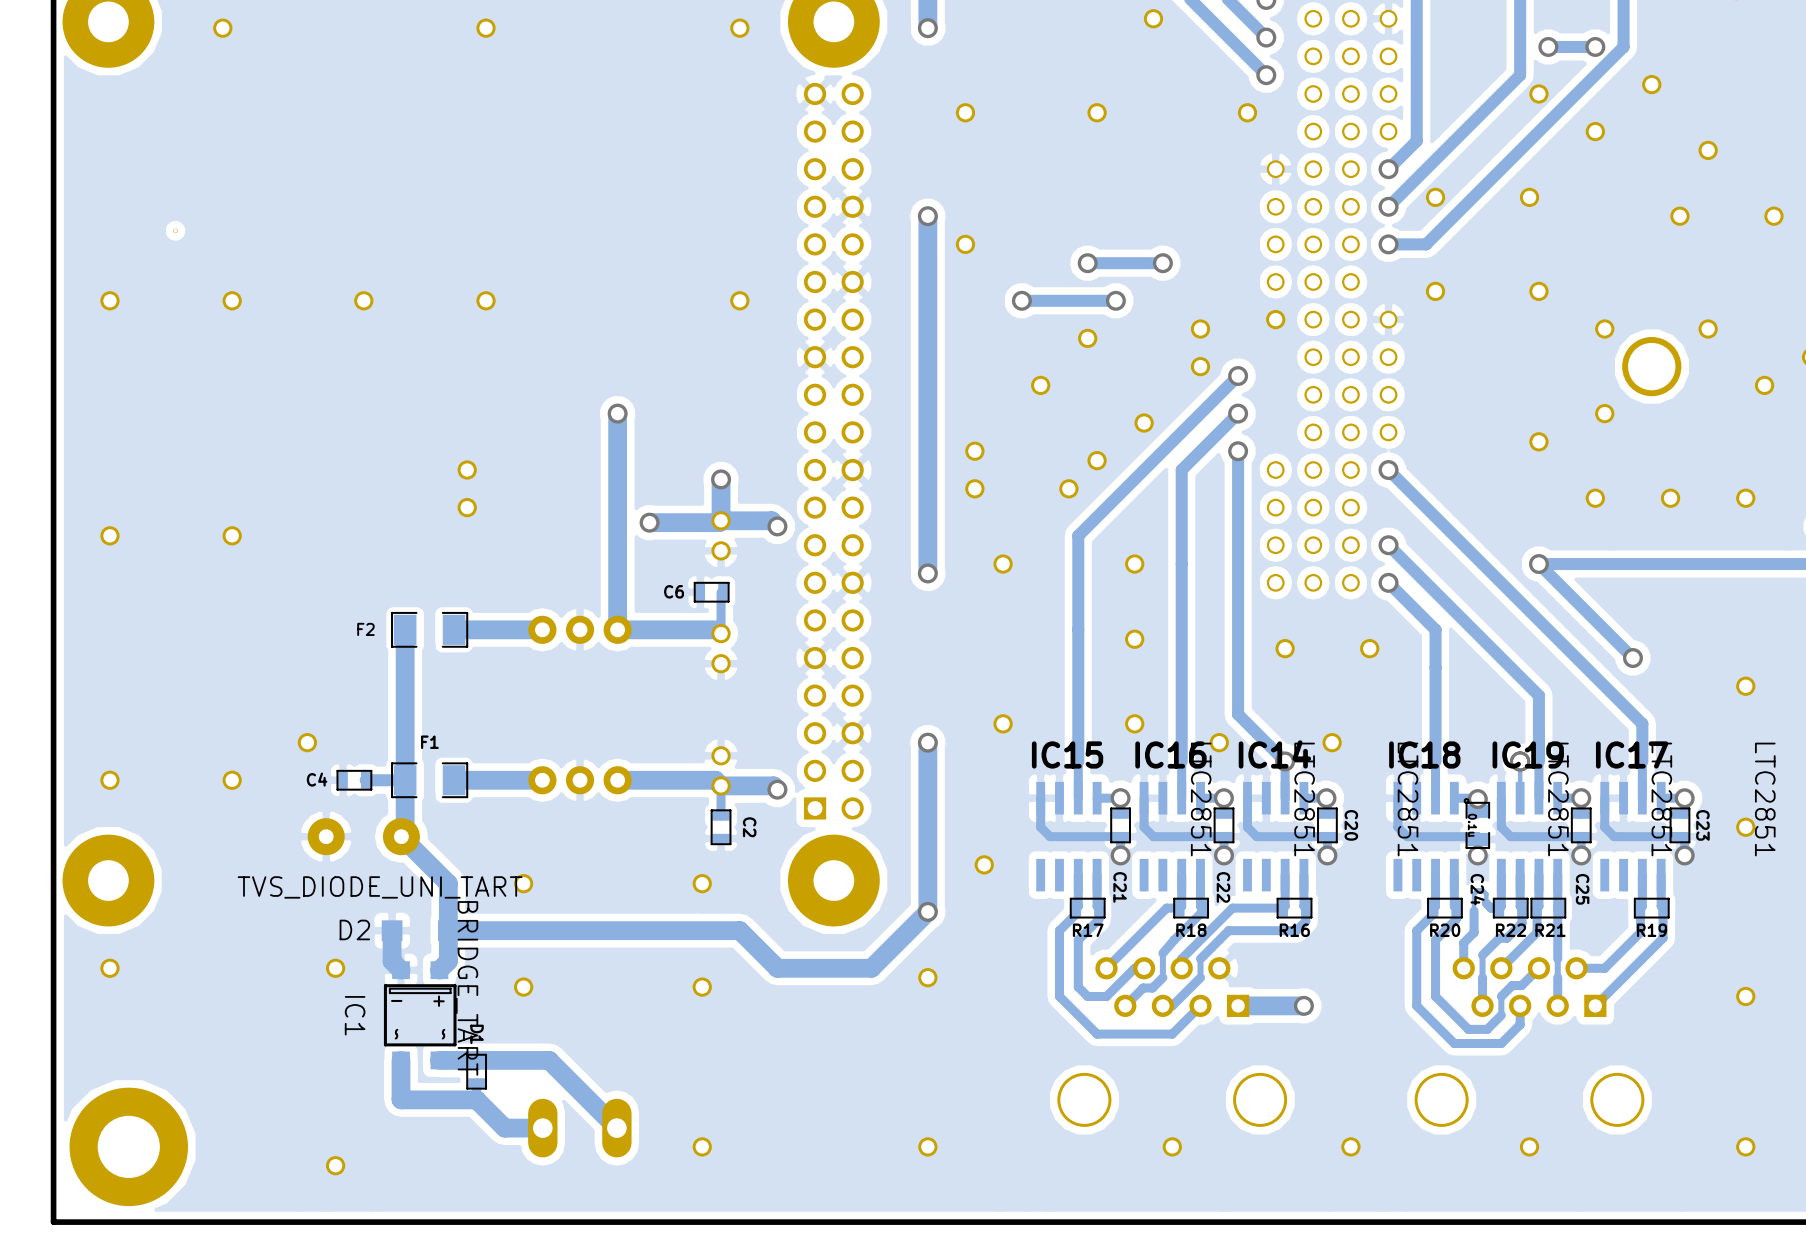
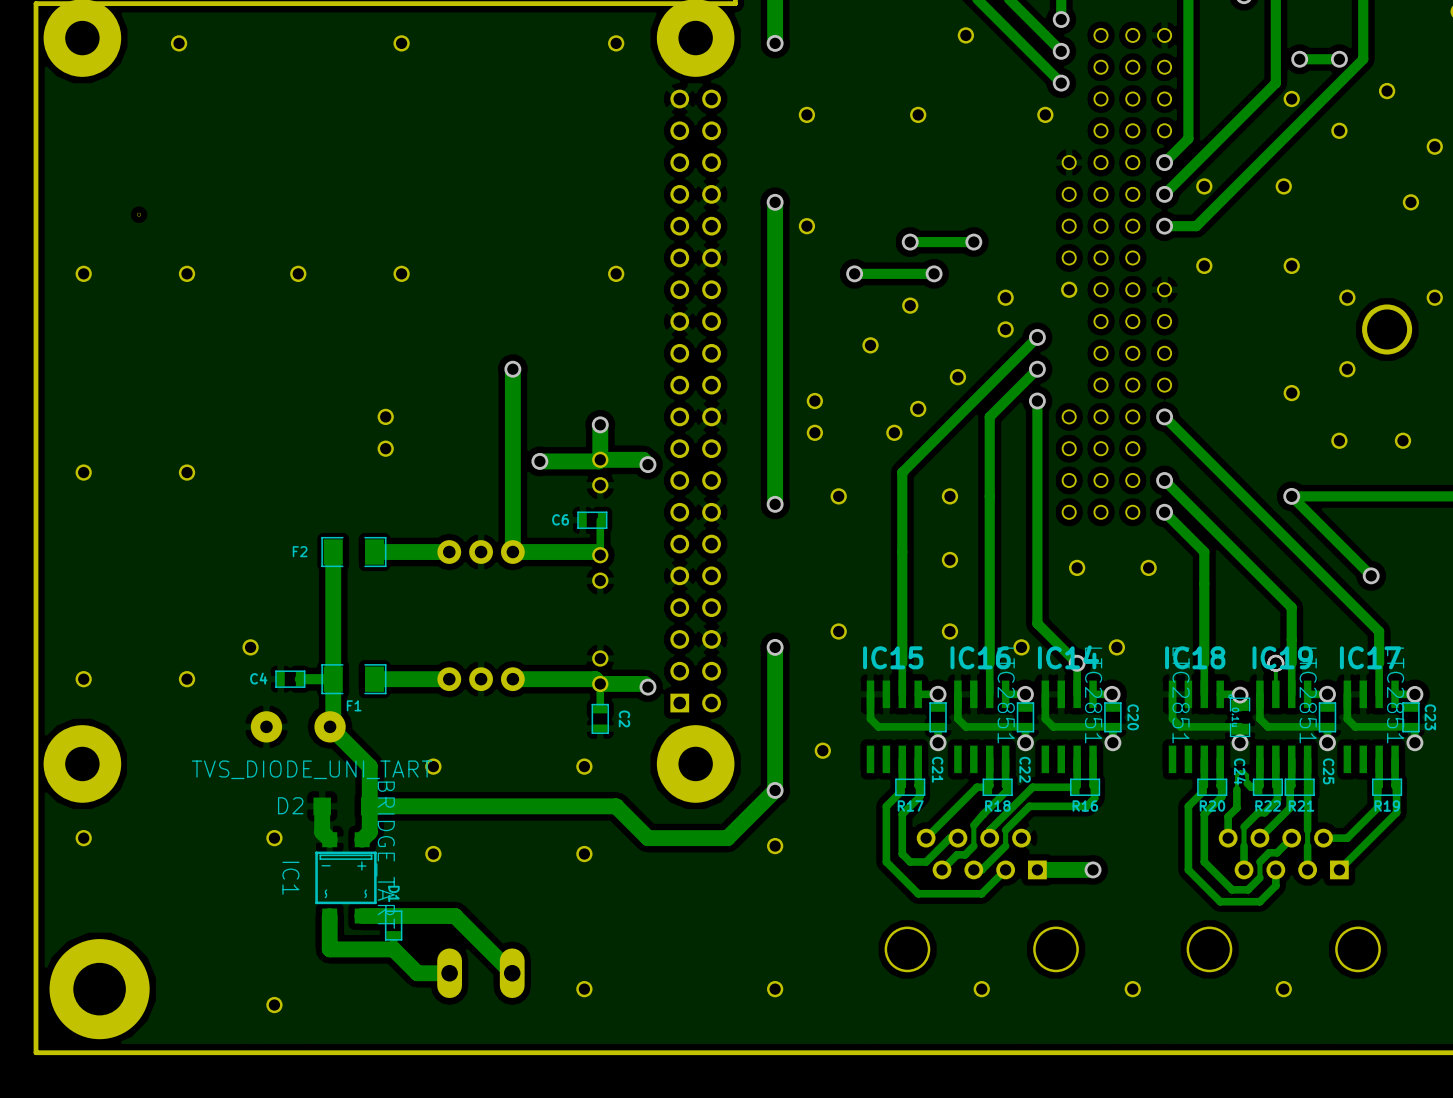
F1 name position: F1 (429, 742) -> F1 (354, 705)

